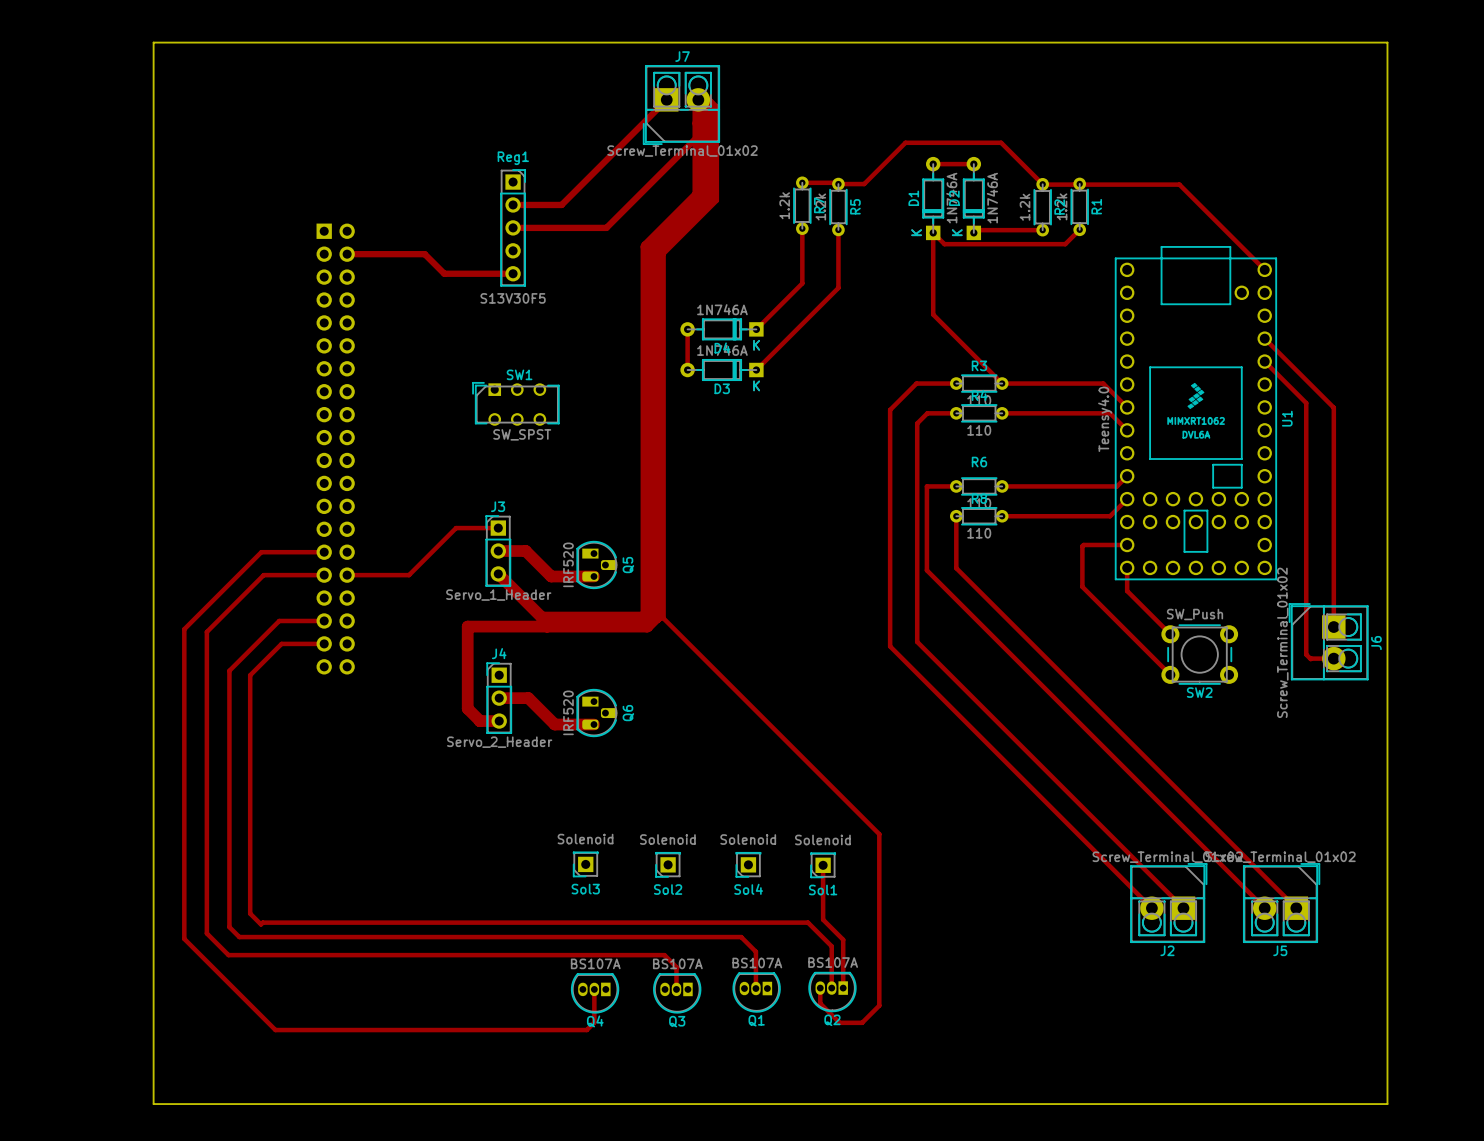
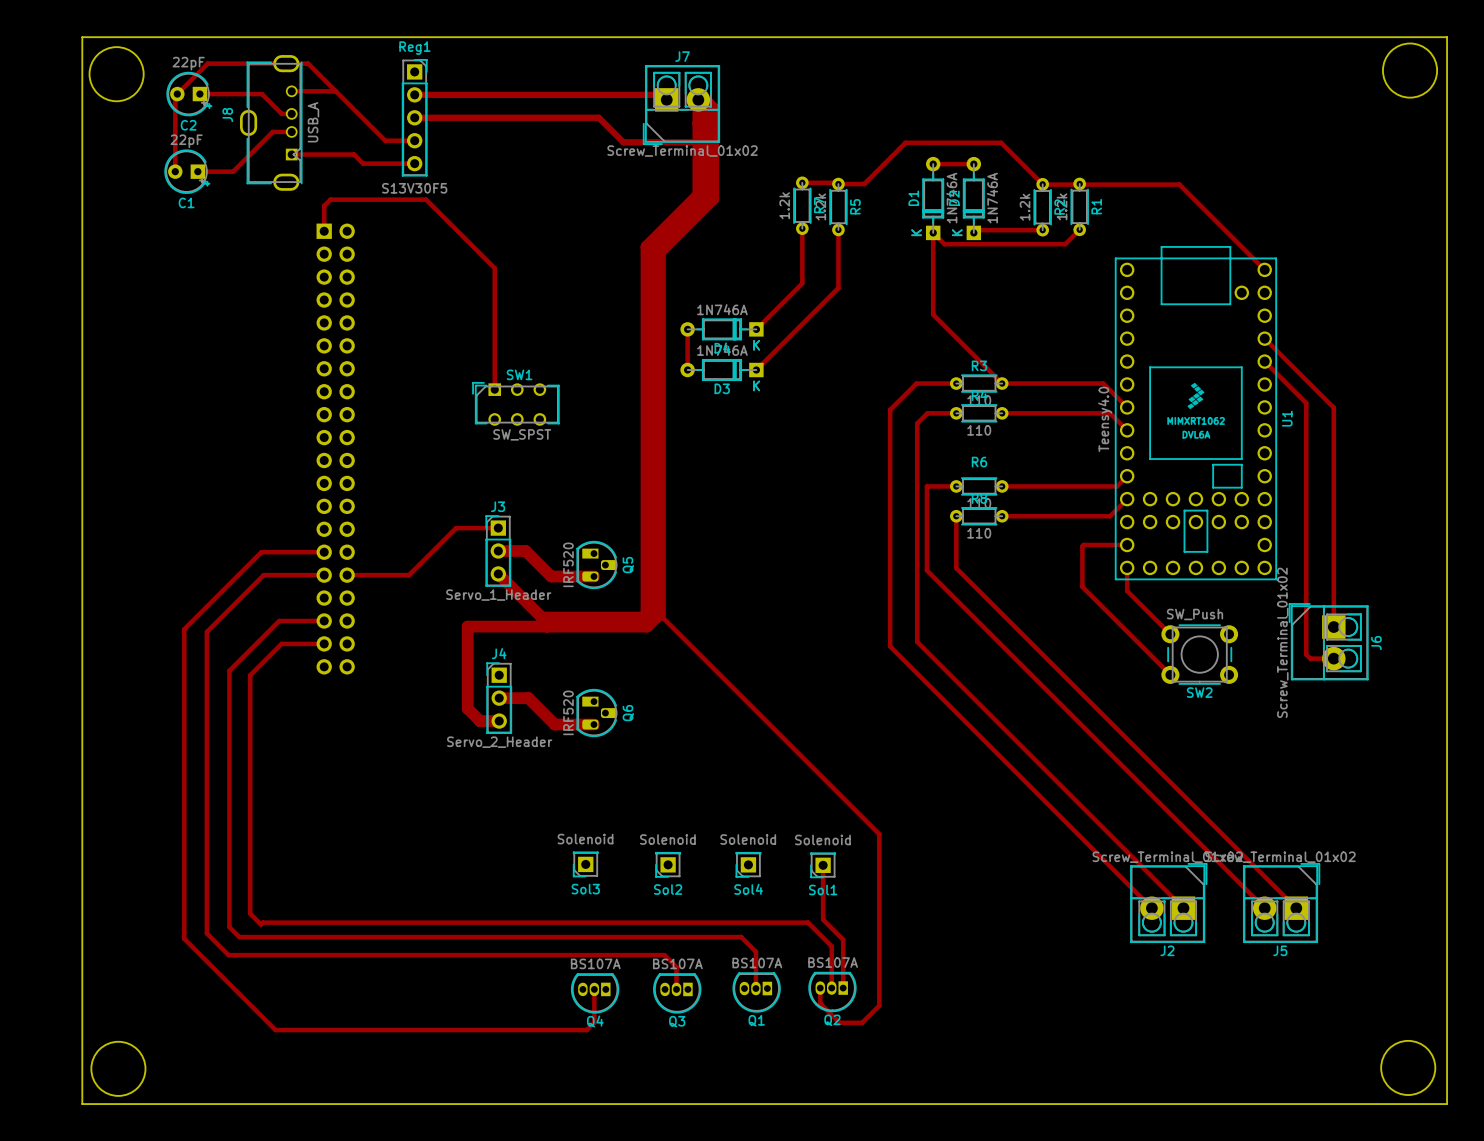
round board edge: none -> [1382, 43, 1438, 99]
round board edge: none -> [89, 46, 145, 102]
track: none -> (291, 91) (335, 91)
C2: none -> 22pF (189, 94)
track: none -> (199, 94) (261, 94) (281, 113) (291, 113)
track: (666, 99) (561, 204) (513, 204) -> (666, 99) (661, 94) (414, 94)
track: none -> (414, 117) (598, 117) (623, 142) (698, 142)
J8: none -> USB_A (271, 122)
track: none -> (291, 131) (272, 131) (233, 171) (197, 171)
track: (698, 136) (606, 227) (513, 227) -> none
track: none -> (414, 140) (385, 140) (308, 63) (207, 63) (175, 96) (175, 171)
track: none -> (291, 154) (353, 154) (363, 163) (414, 163)
C1: none -> 22pF (187, 171)
Reg1 position: (513, 227) -> (414, 117)
track: none -> (324, 231) (324, 205) (330, 199) (426, 199) (494, 268) (494, 389)
track: (347, 254) (424, 254) (444, 273) (513, 273) -> none
round board edge: none -> [1380, 1040, 1436, 1096]
round board edge: none -> [90, 1041, 146, 1097]
board edge: (153, 1104) (153, 42) (1387, 42) (1387, 1104) -> (153, 1104) (82, 1104) (82, 37) (1447, 37) (1447, 1104) (1387, 1104)

